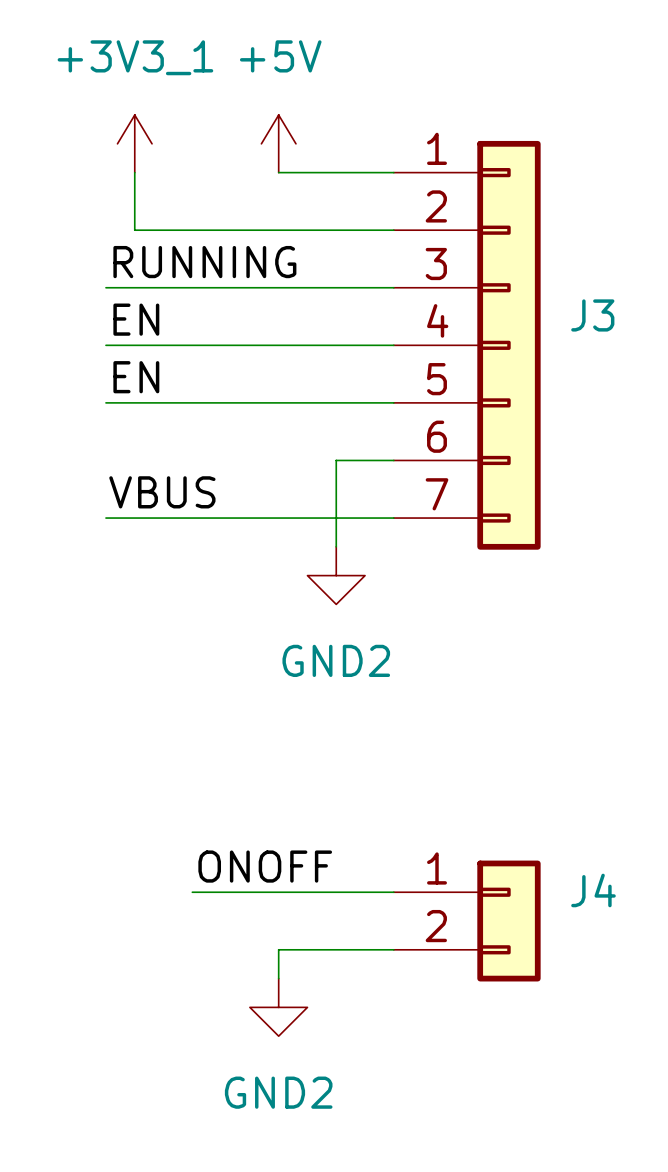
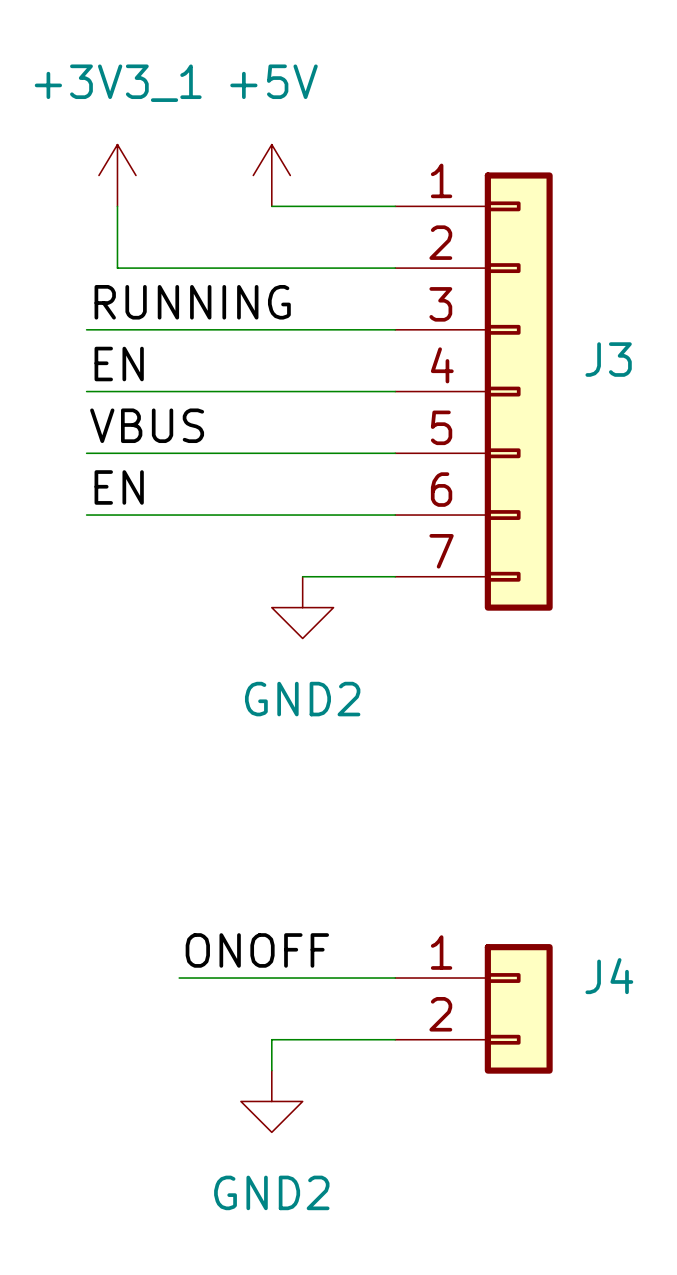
label: EN (136, 377) -> VBUS (147, 425)
label: none -> EN (119, 487)
wire: (336, 460) (336, 546) -> (333, 515) (86, 515)
label: VBUS (162, 492) -> none
wire: (105, 518) (307, 518) -> none
power symbol position: GND2 (336, 575) -> GND2 (302, 607)

